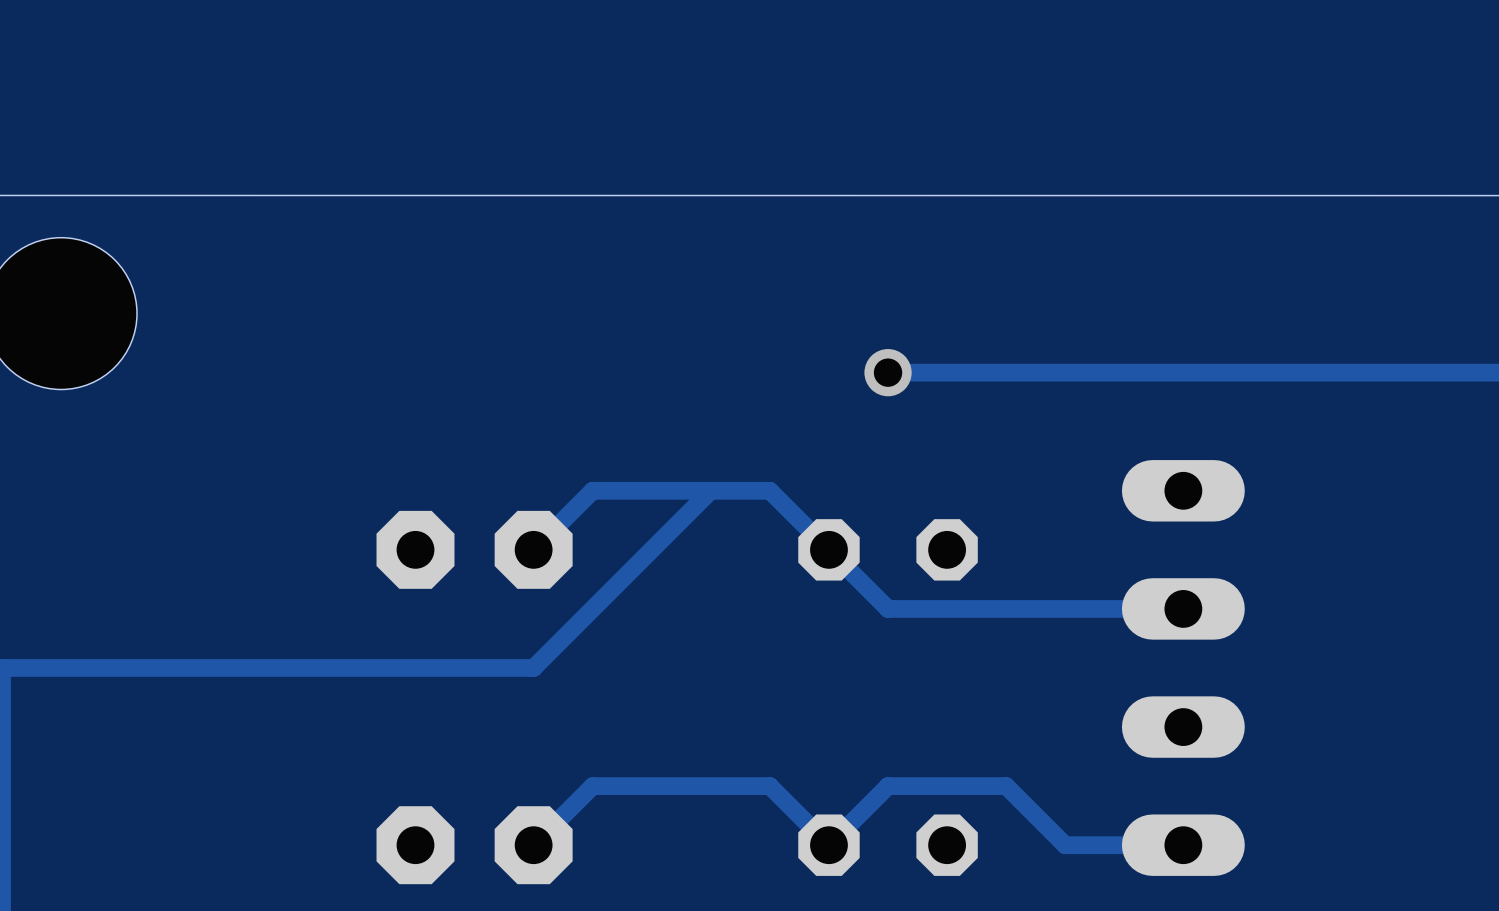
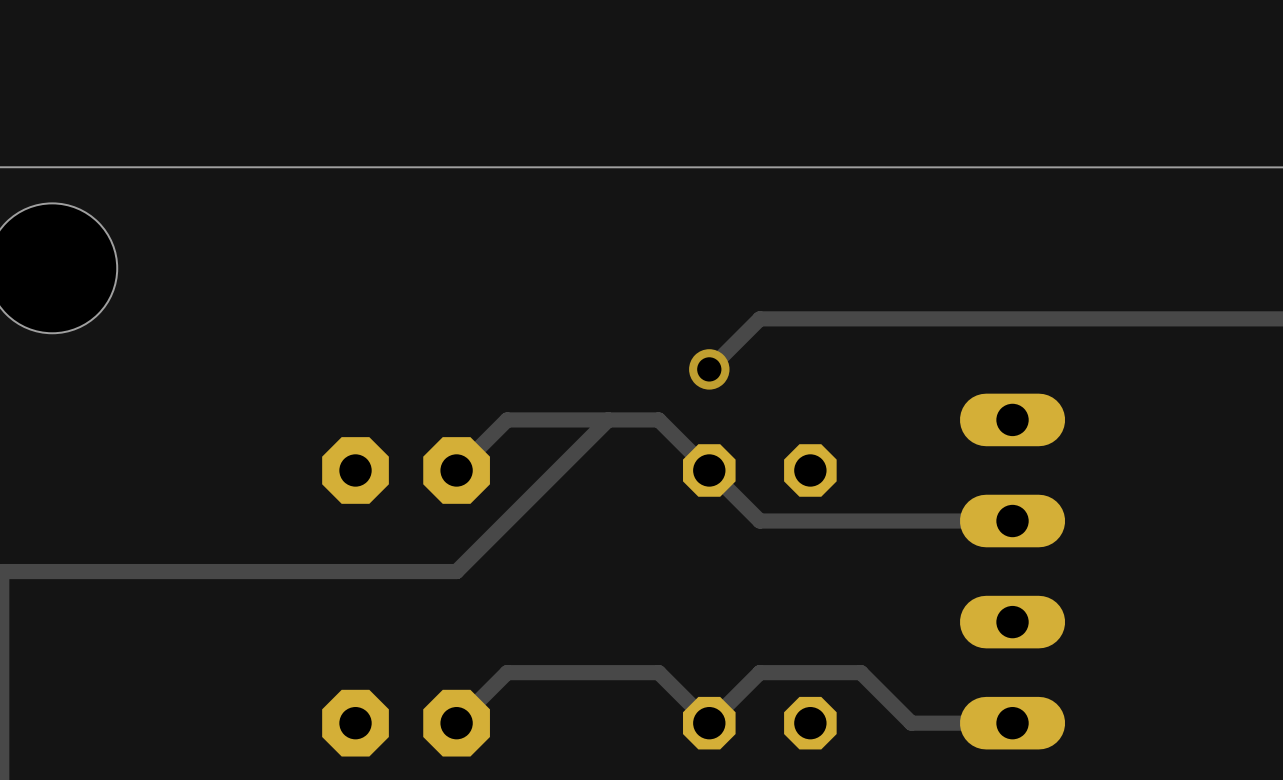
track: none -> (759, 318) (709, 369)
via position: (888, 372) -> (709, 369)

